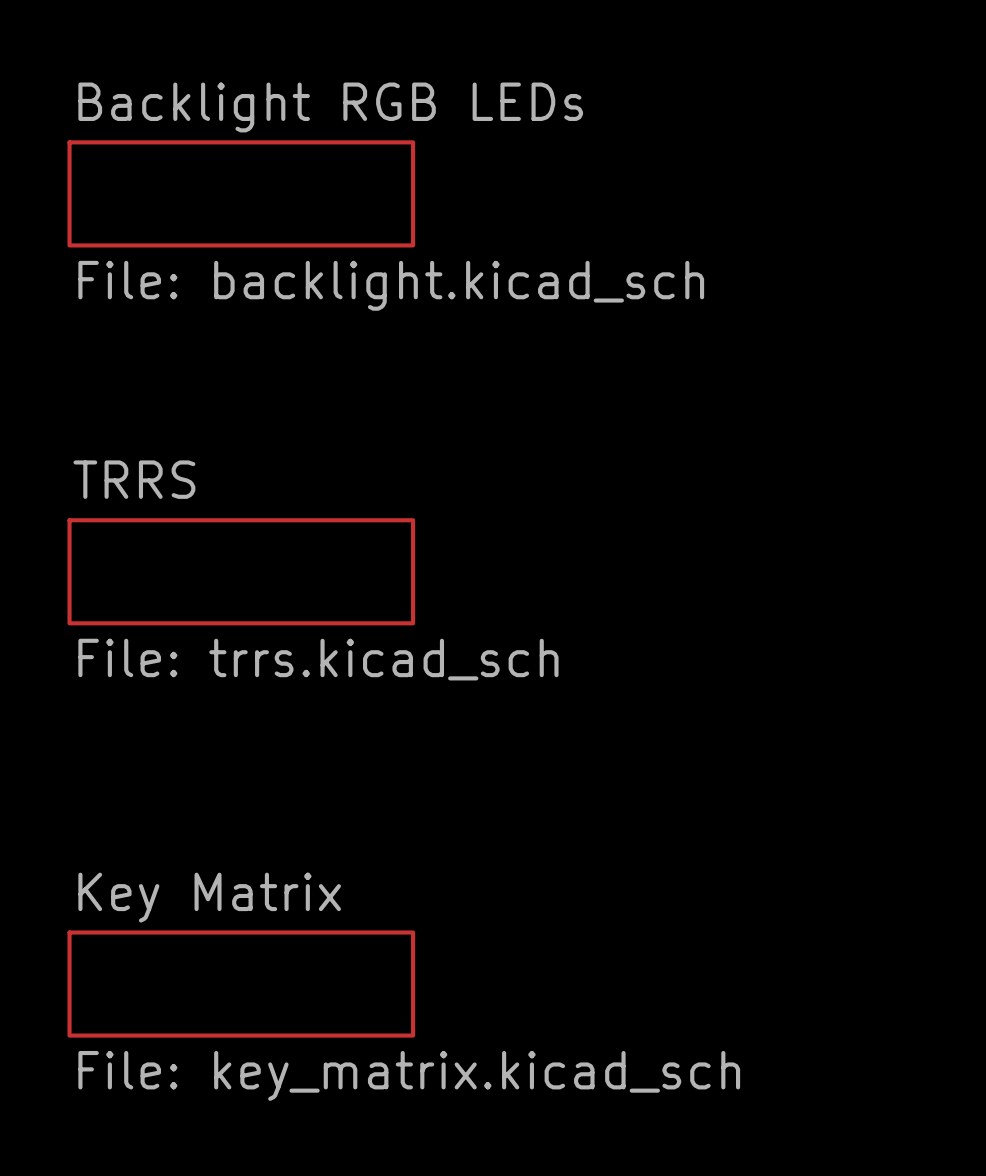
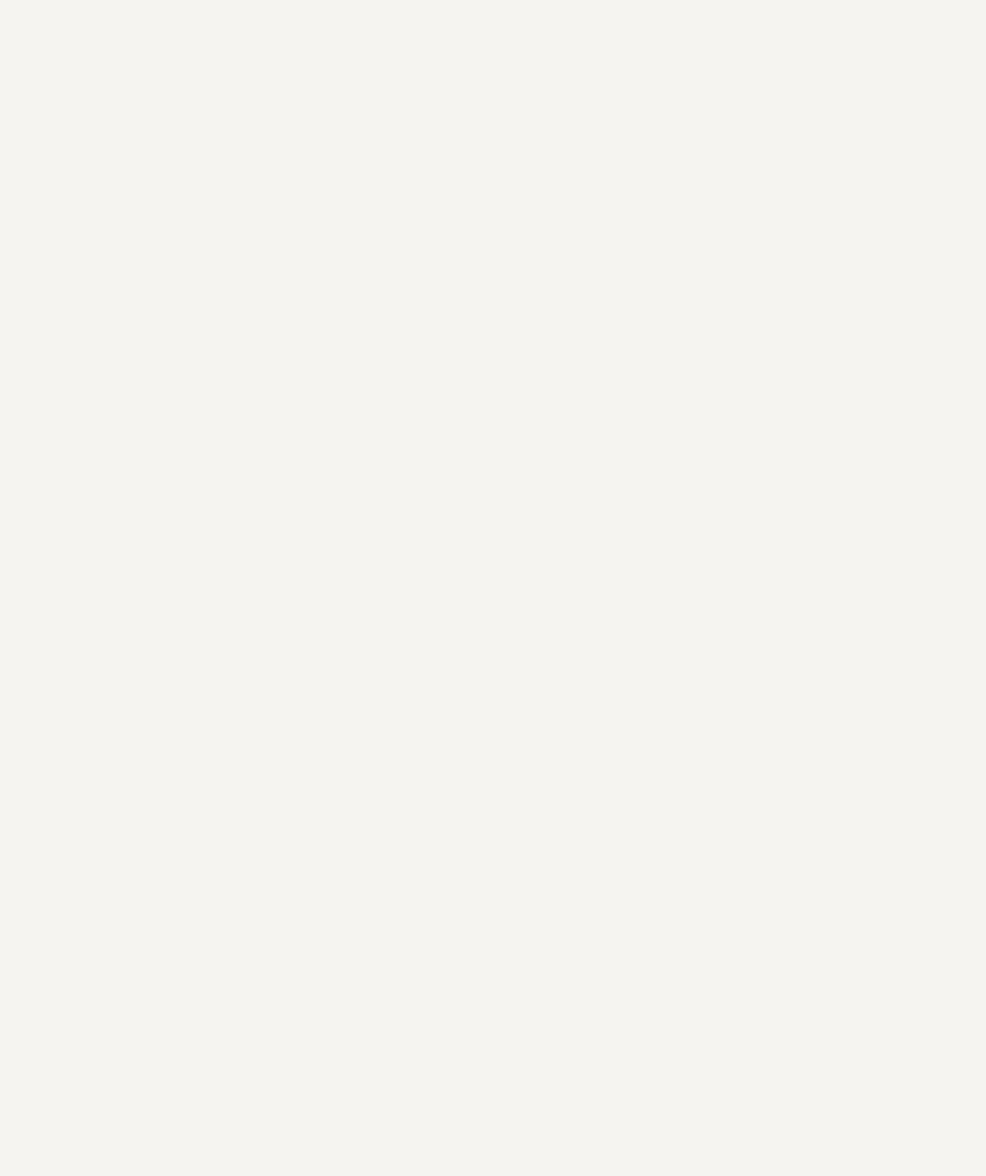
sheet Backlight RGB LEDs: File: backlight.kicad_sch (241, 193) -> none
sheet TRRS: File: trrs.kicad_sch (241, 571) -> none
sheet Key Matrix: File: key_matrix.kicad_sch (241, 984) -> none

